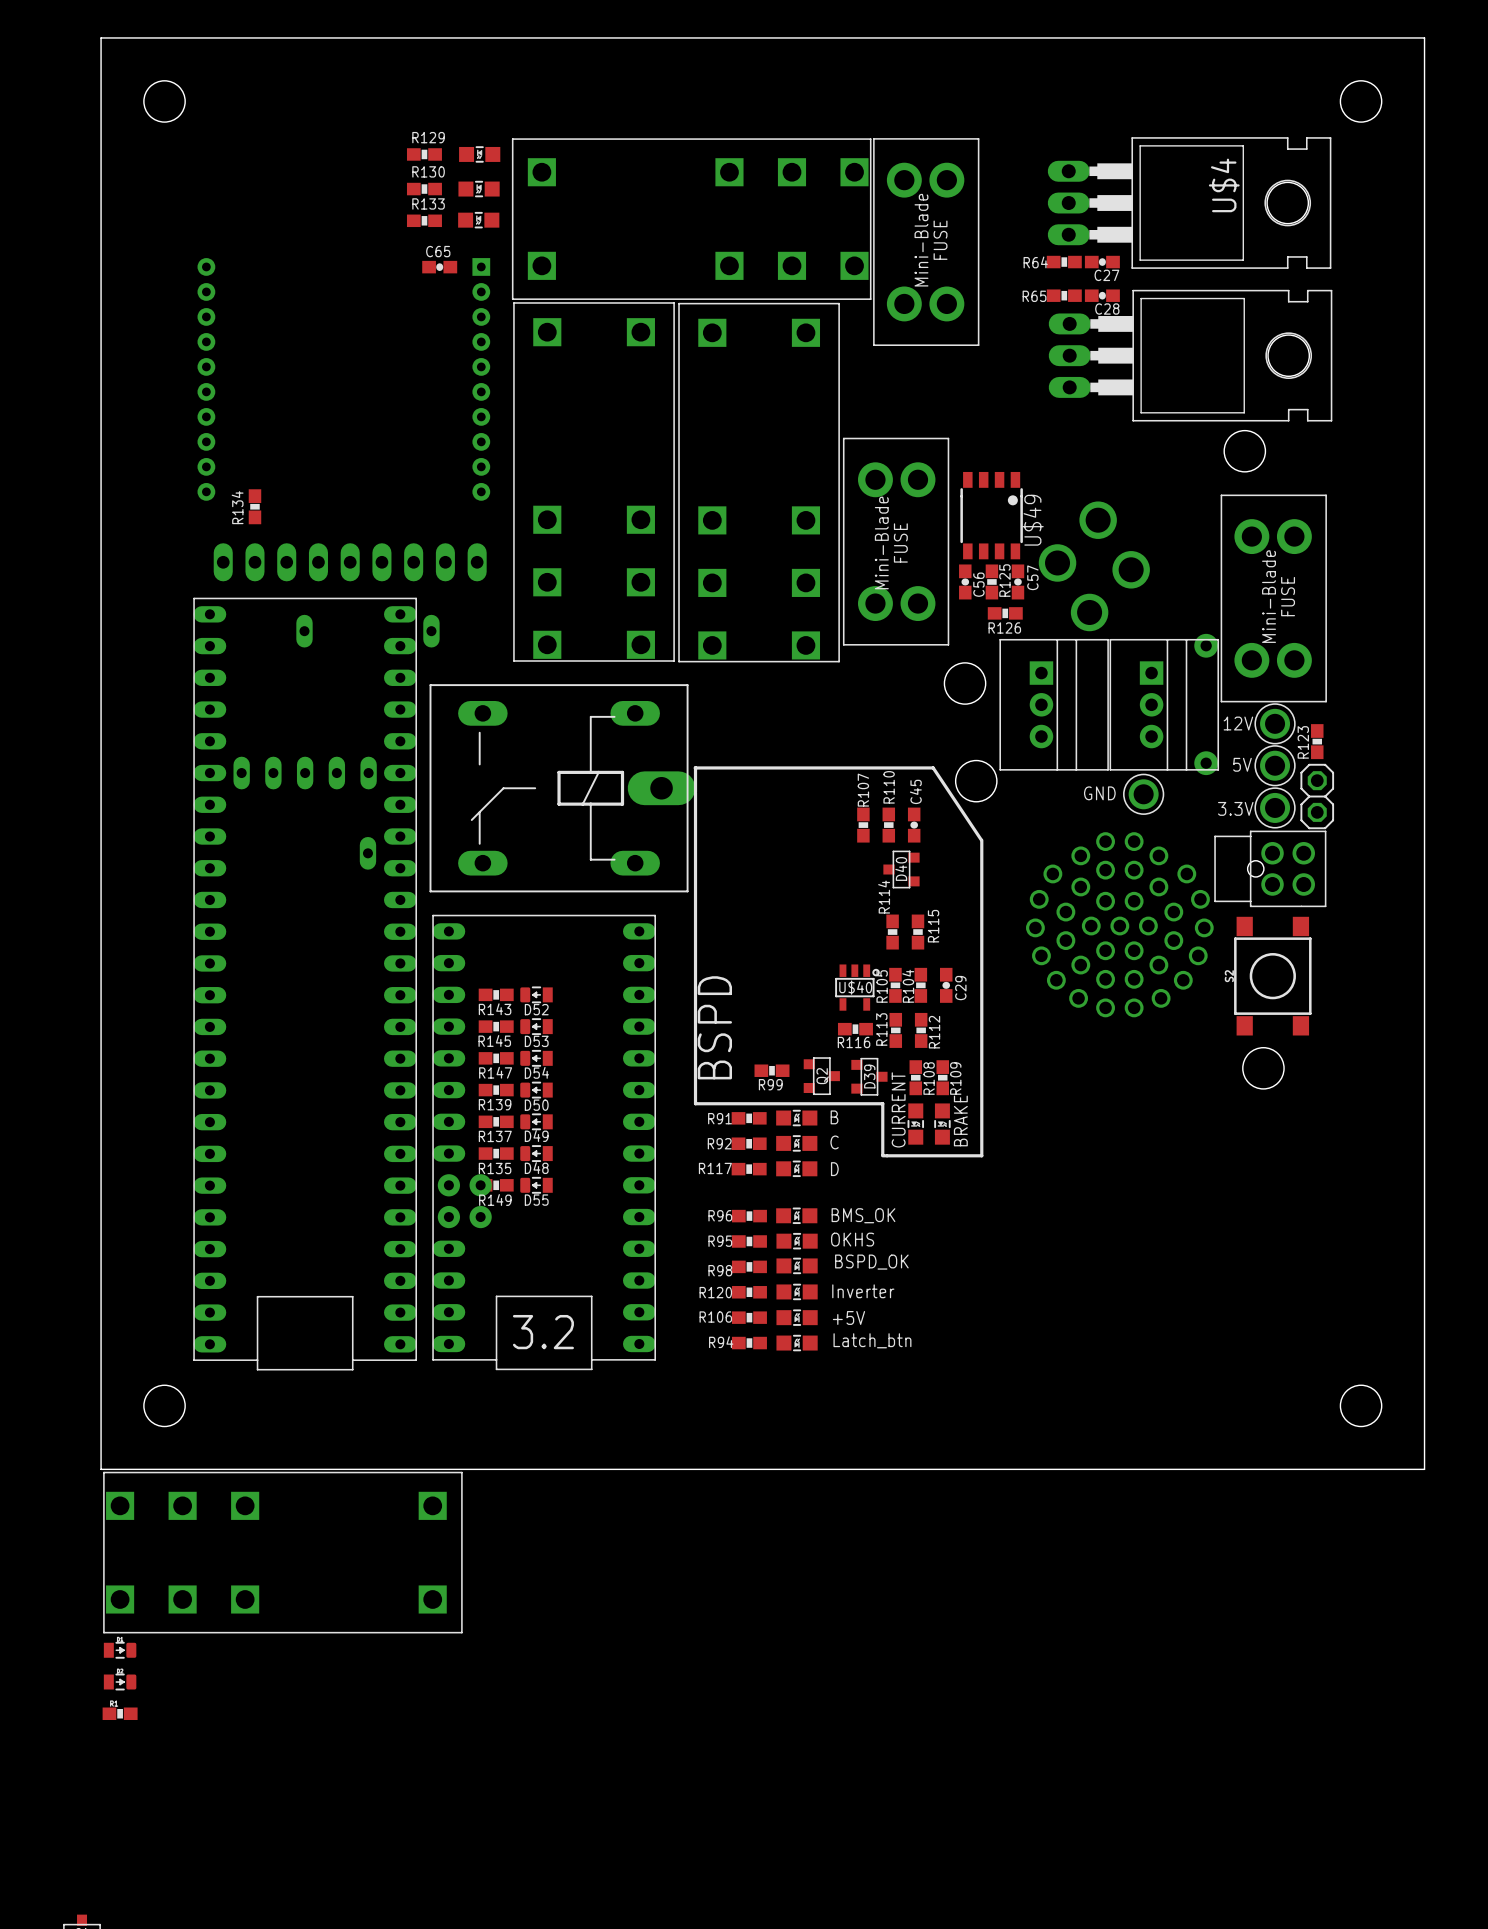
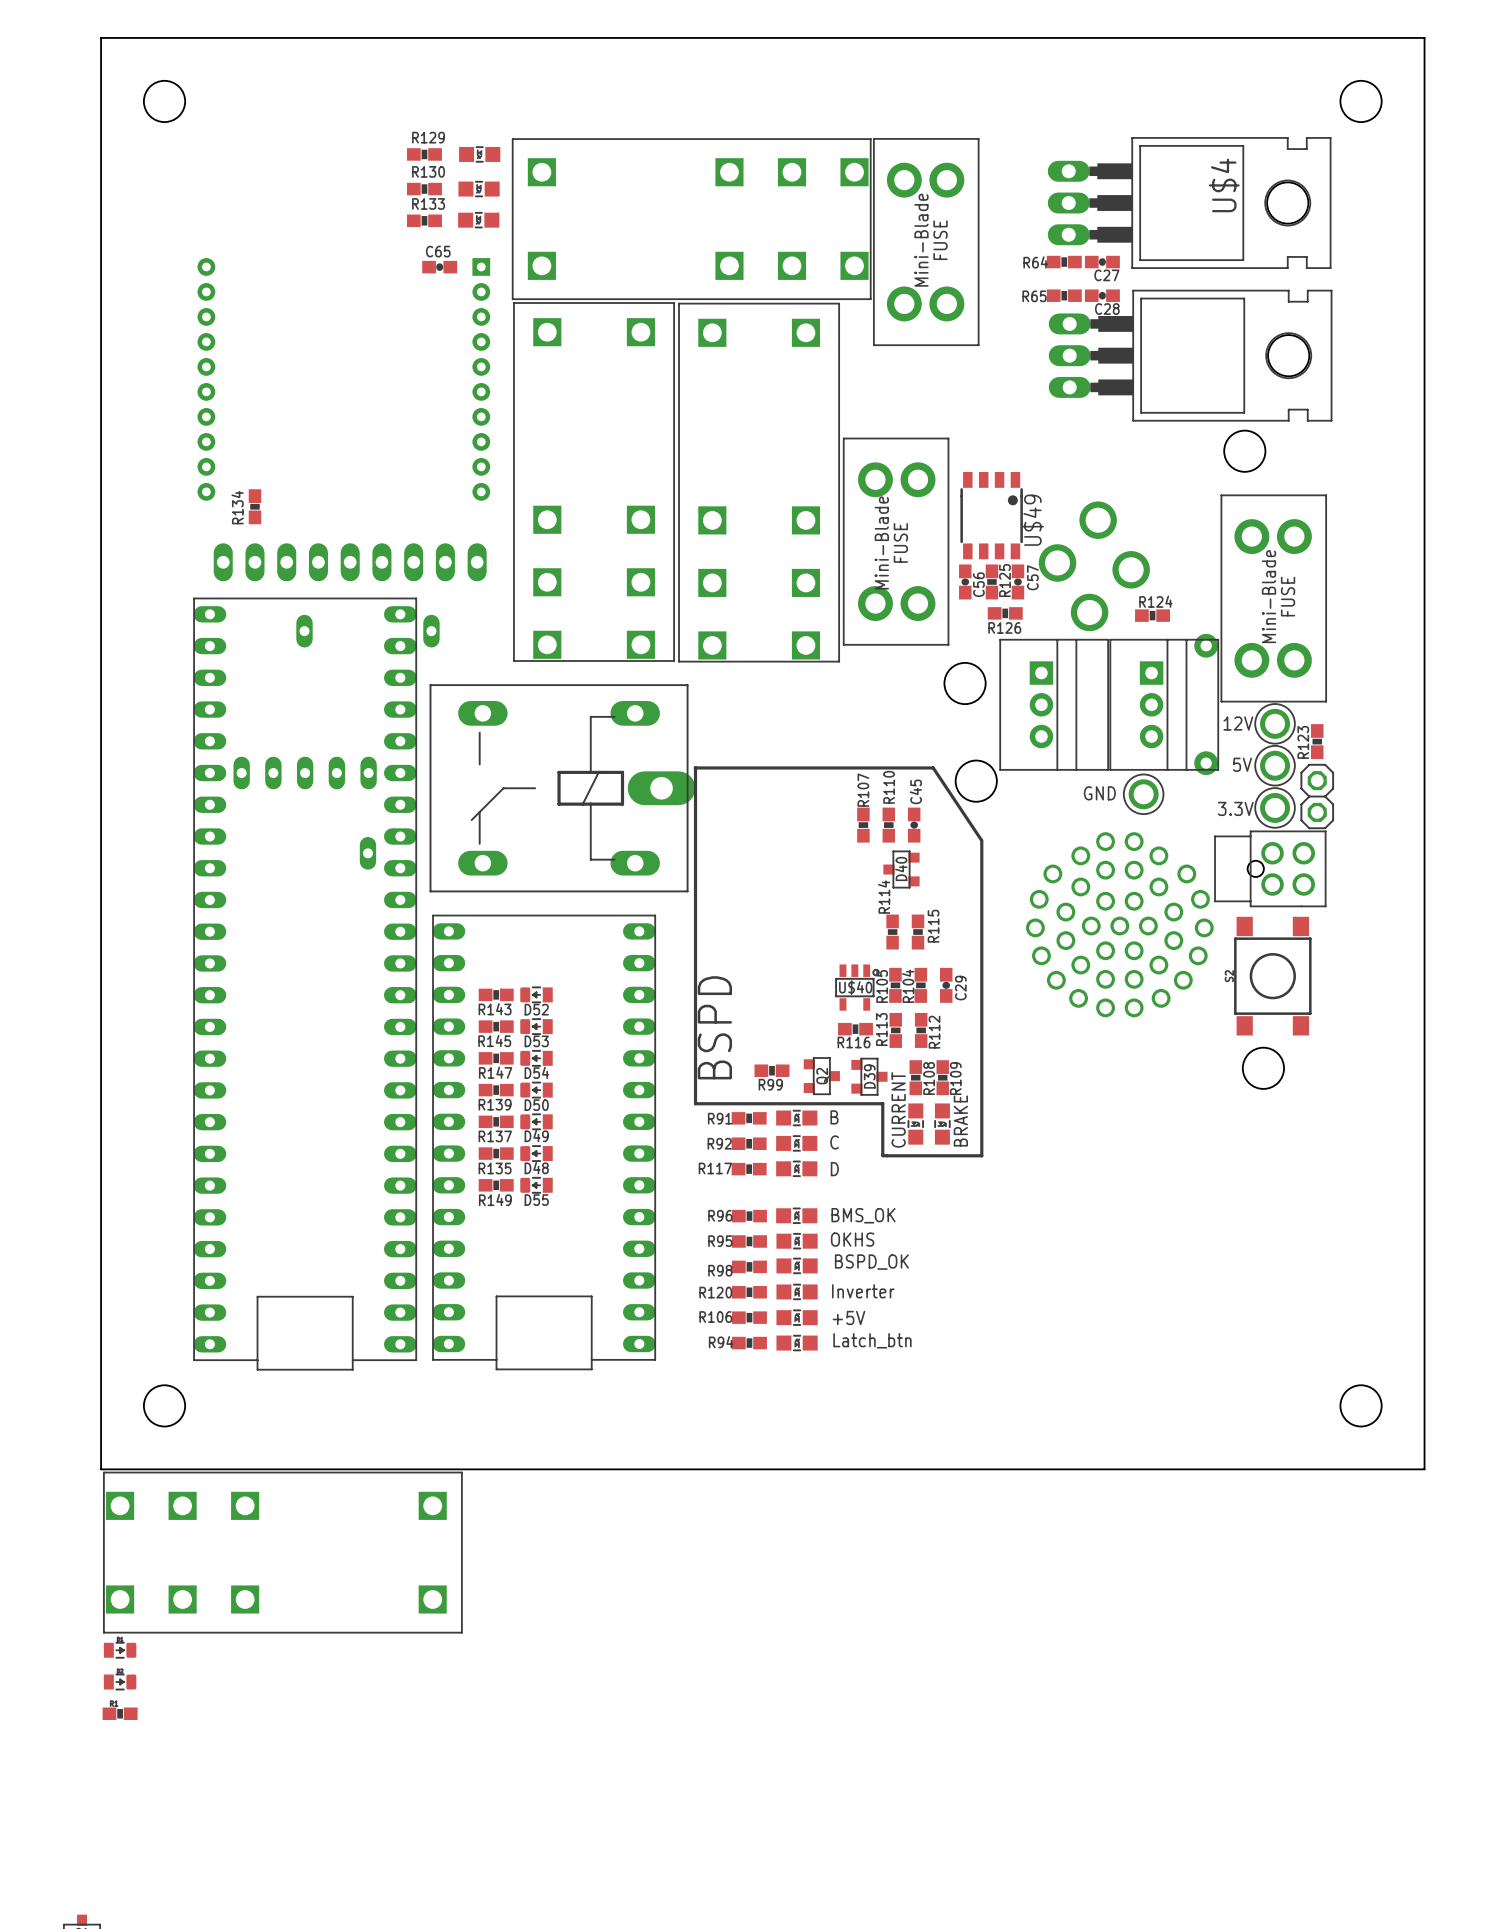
R124: none -> (1152, 615)
part footprint: [432, 914, 656, 1371] -> [432, 914, 656, 1371]

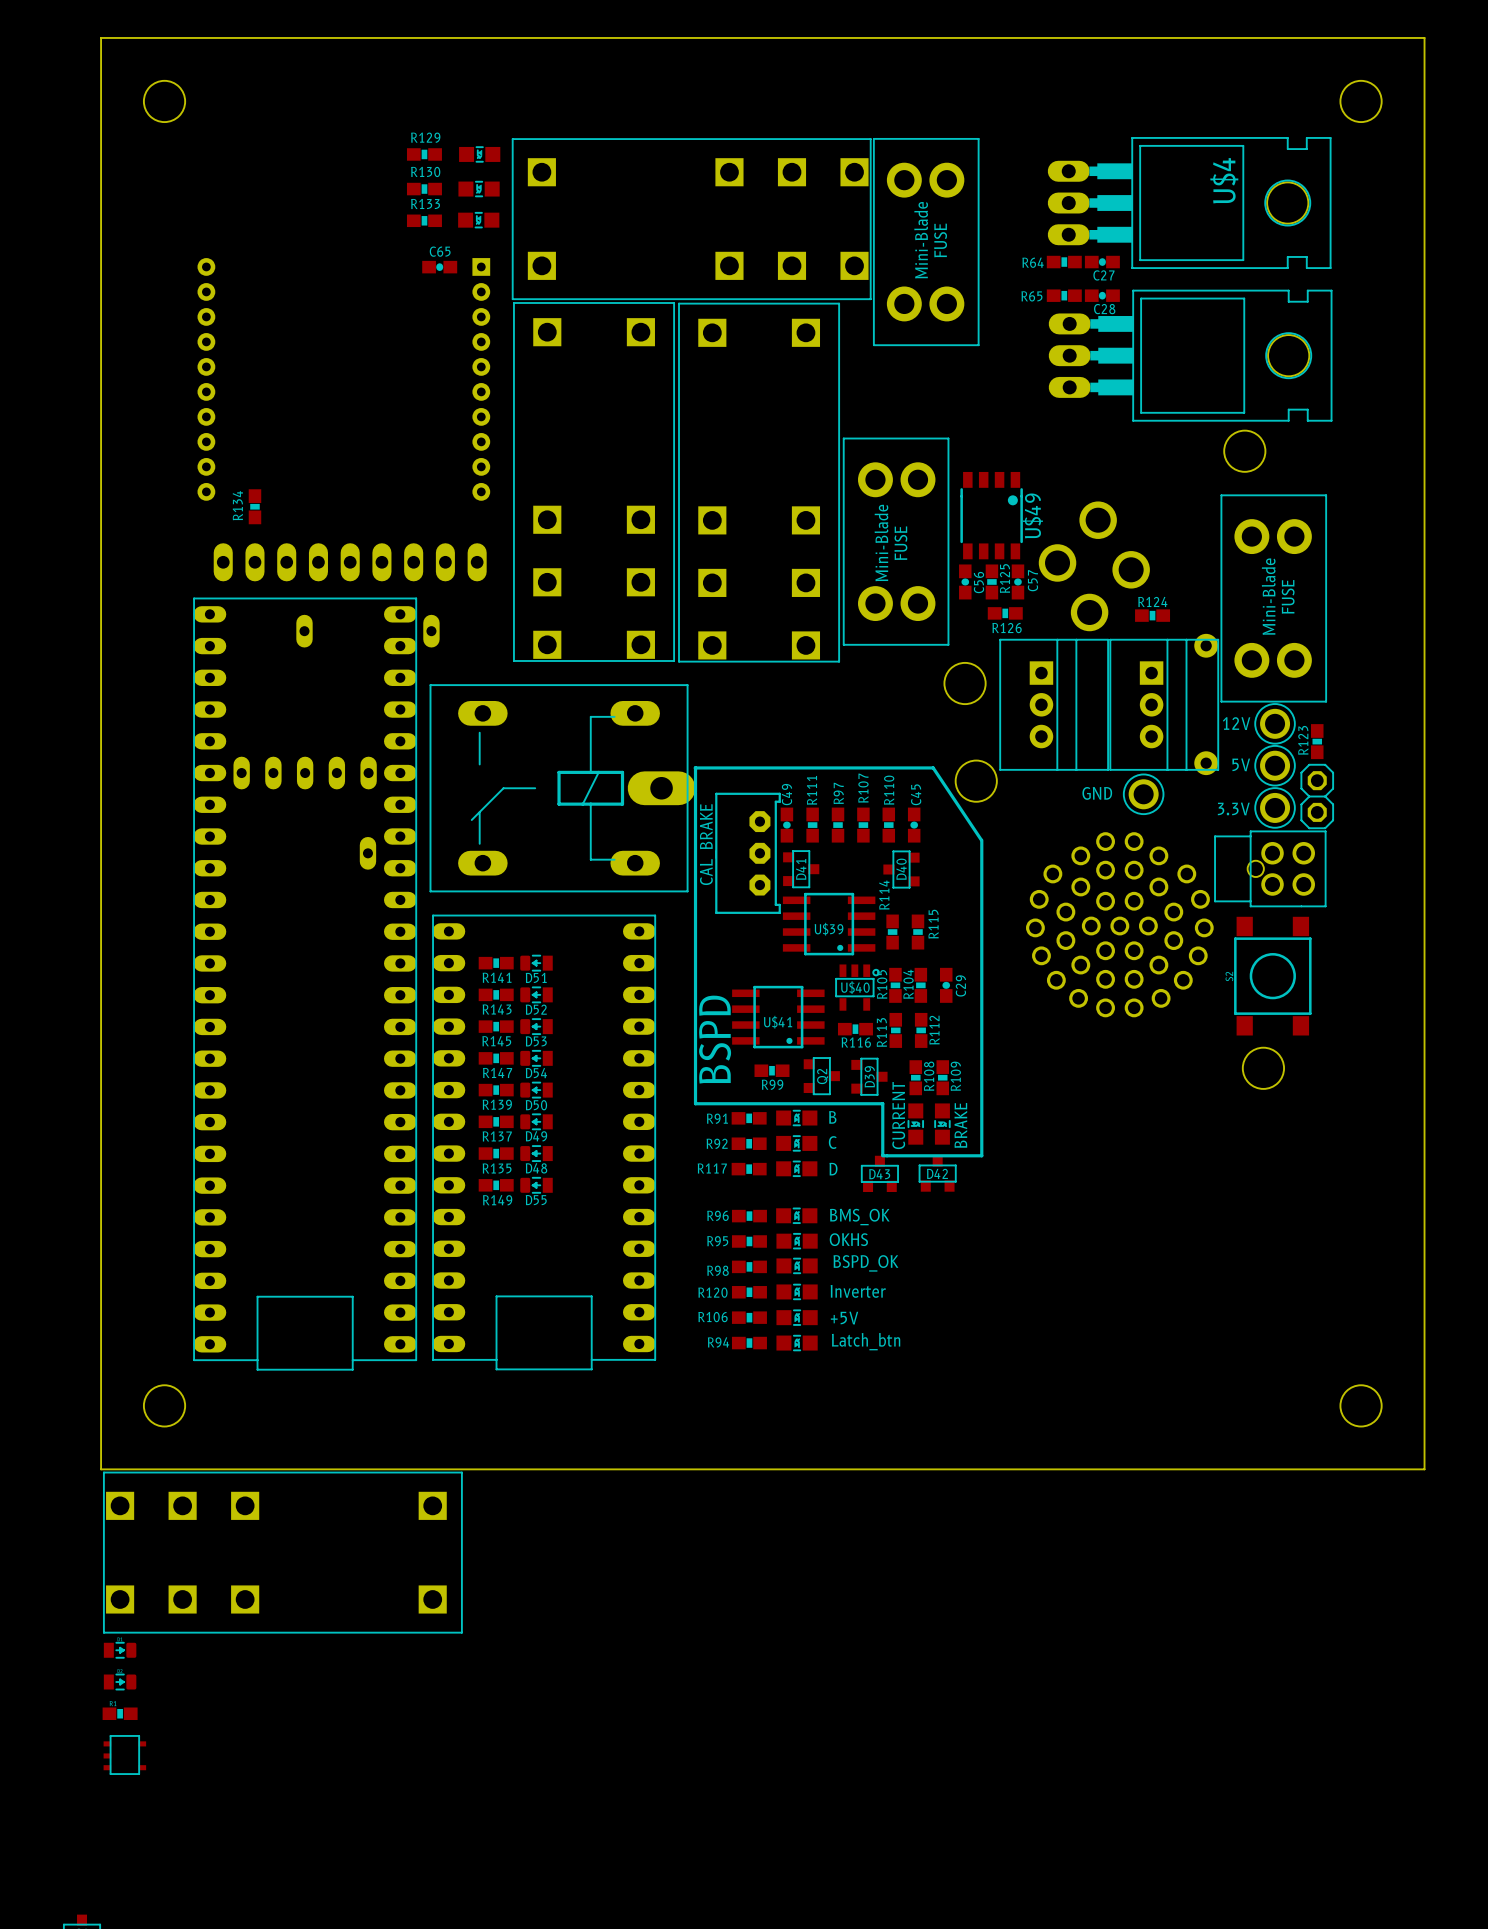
C49: none -> (786, 825)
R111: none -> (812, 825)
R97: none -> (838, 825)
CAL_BRAKE: none -> (748, 853)
D41: none -> (801, 869)
U$39: none -> (829, 924)
R141: none -> (496, 963)
D51: none -> (536, 963)
U$41: none -> (778, 1017)
D43: none -> (879, 1173)
D42: none -> (937, 1173)
part: none -> (124, 1755)

